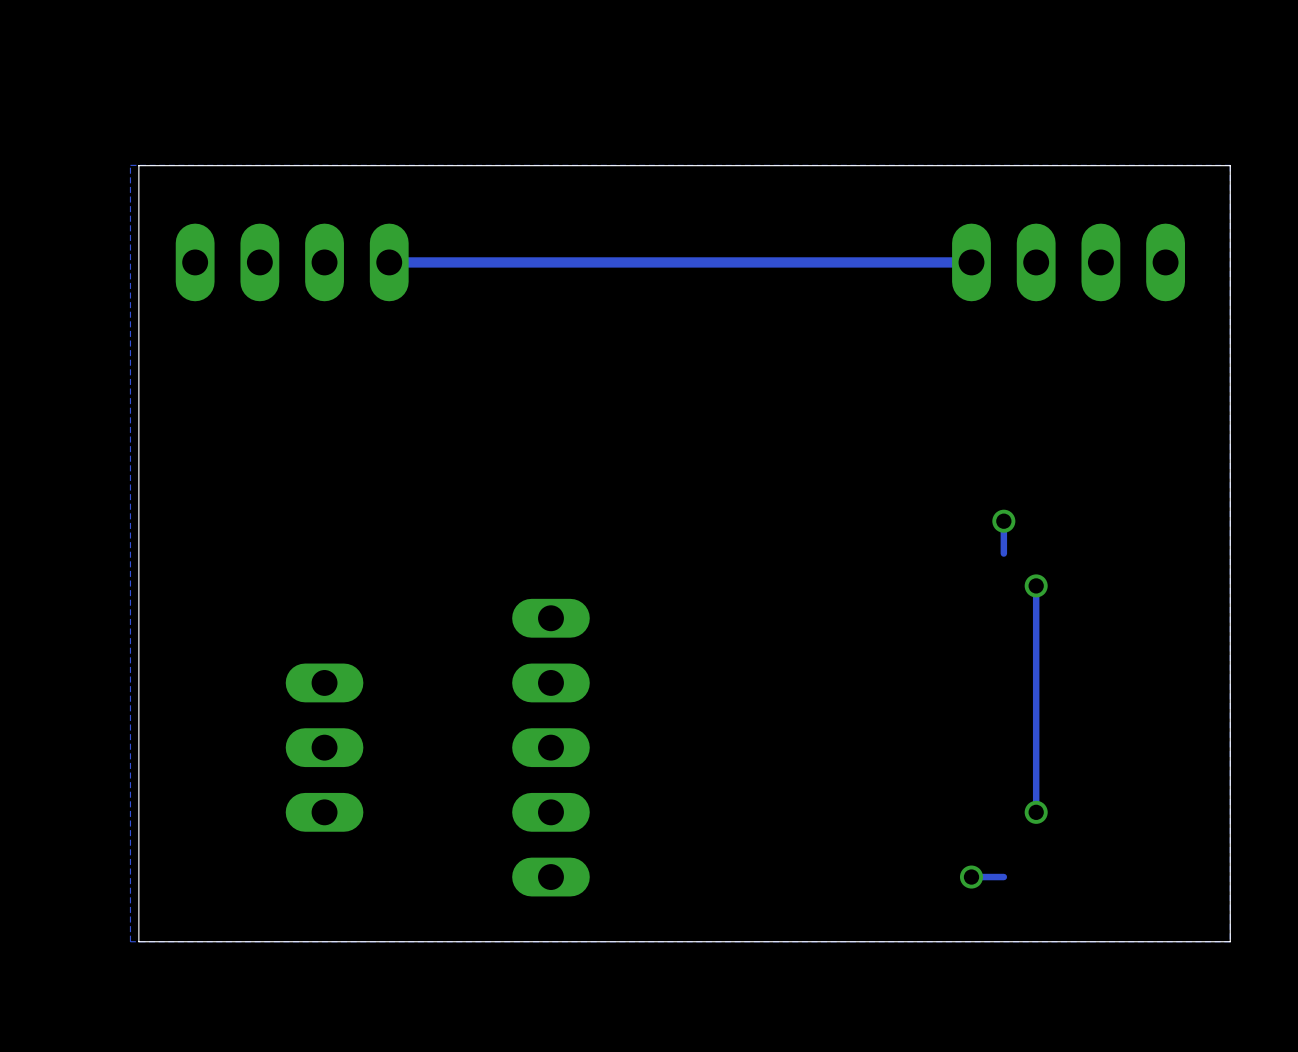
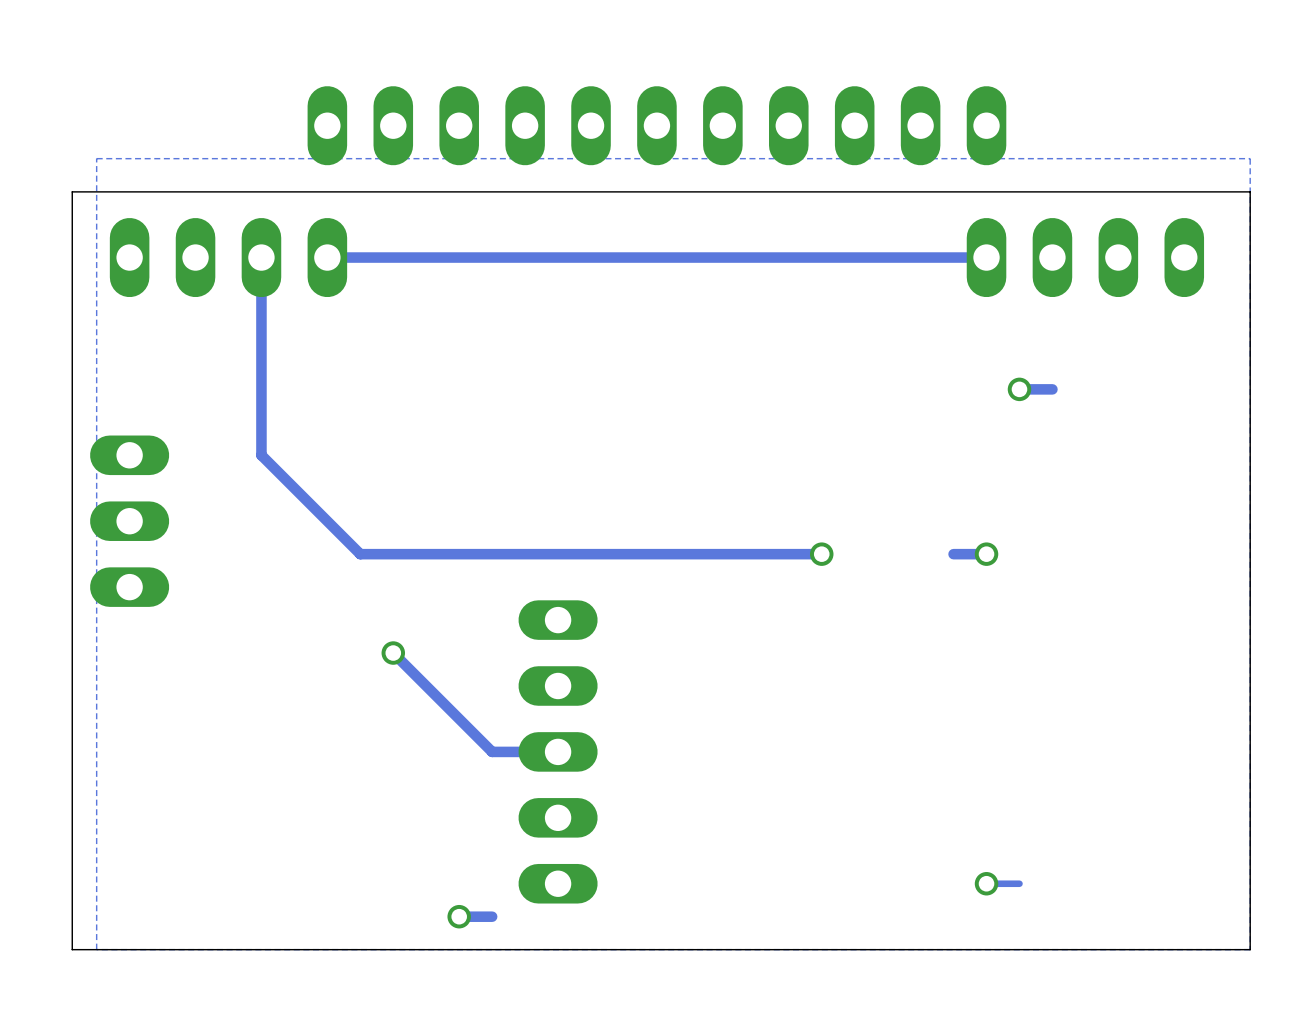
part: none -> (656, 125)
zone outline: (130, 165) (130, 941) -> (129, 158) (96, 158) (96, 949) (129, 949)
board edge: (1230, 198) (1230, 165) (138, 165) (138, 941) -> (1250, 191) (72, 191) (72, 949) (138, 949)
track: none -> (261, 257) (261, 455) (360, 554) (821, 554)
part position: (292, 262) -> (228, 257)
track: none -> (393, 257) (327, 257)
via: none -> (1019, 389)
track: none -> (1052, 389) (1019, 389)
track: (1003, 521) (1003, 553) -> none
via: (1003, 521) -> none
via: none -> (821, 554)
track: none -> (986, 554) (953, 554)
via: none -> (986, 554)
track: (1036, 585) (1036, 812) -> none
via: (1036, 585) -> none
track: none -> (393, 653) (492, 751) (558, 751)
via: none -> (393, 653)
part position: (324, 747) -> (129, 521)
via: (1036, 812) -> none
via: none -> (459, 916)
track: none -> (492, 916) (459, 916)

